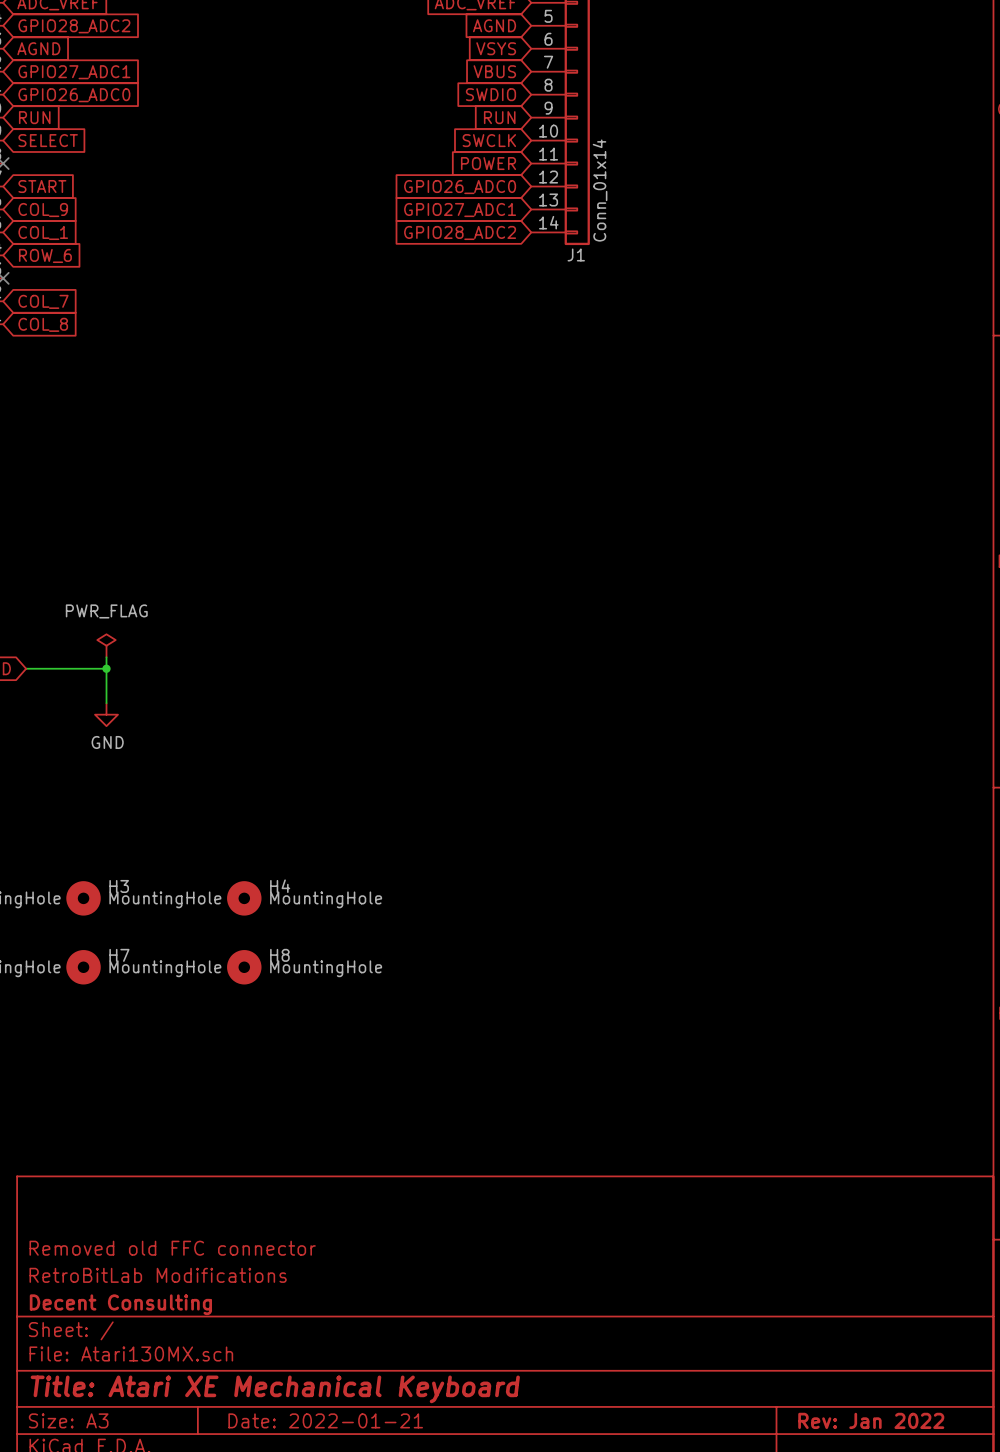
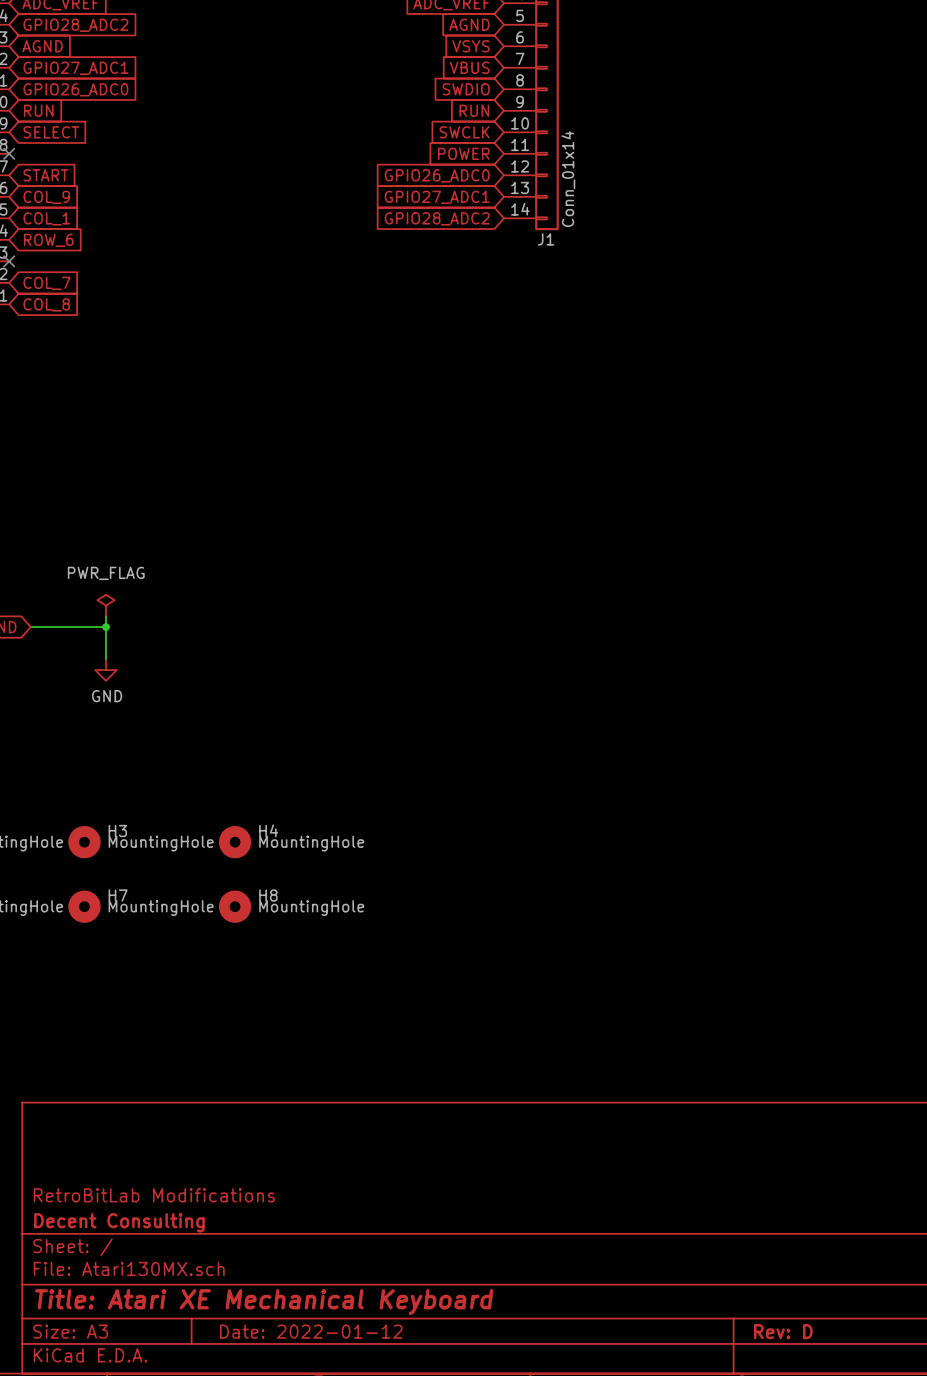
title block: Removed old FFC connector (172, 1248) -> none
title block: Date: 2022-01-21 (325, 1420) -> Date: 2022-01-12 (311, 1331)
title block: Rev: Jan 2022 (871, 1420) -> Rev: D (783, 1331)

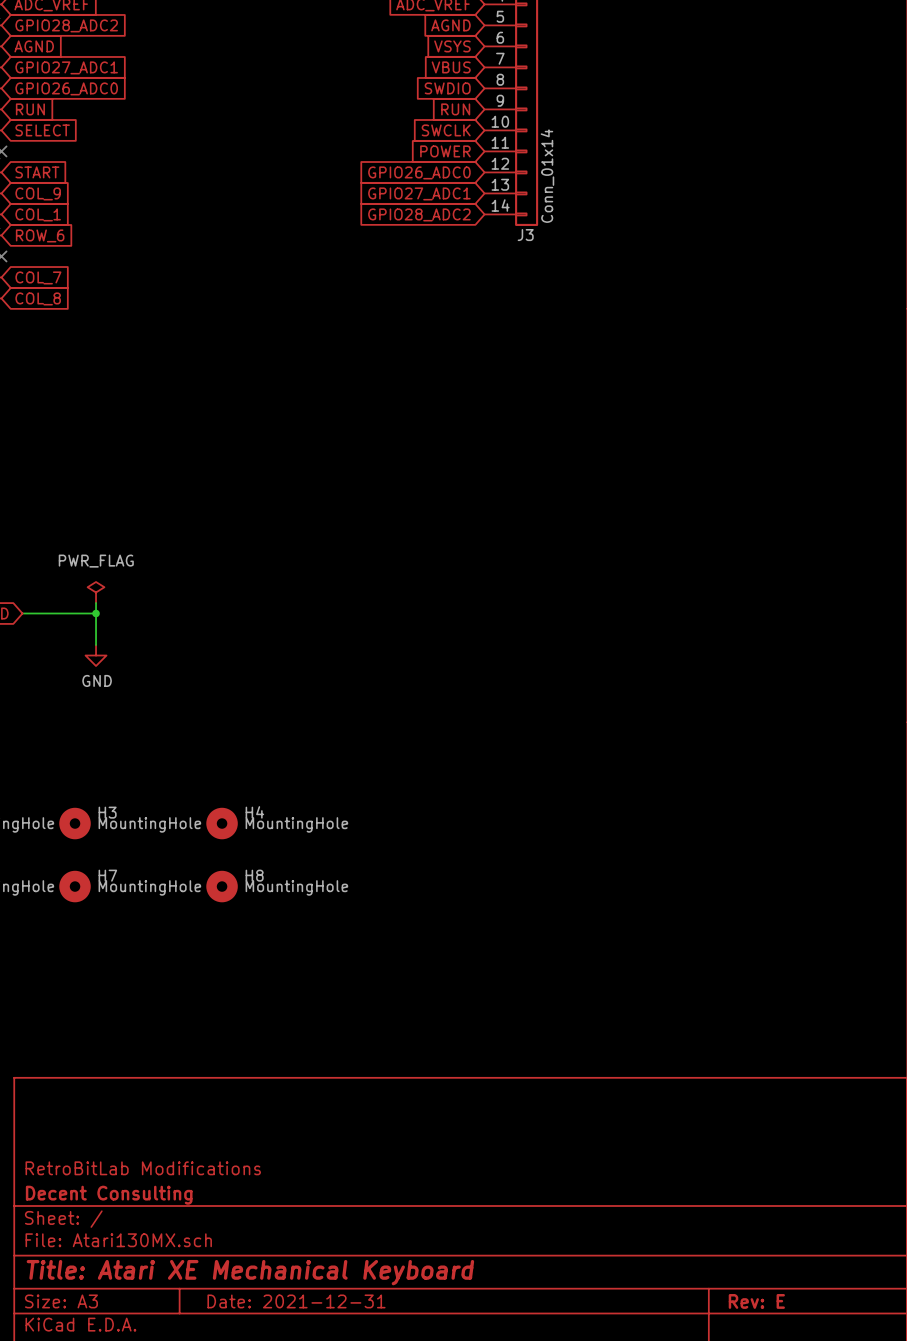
J1 name: J1 (546, 239) -> J3 (525, 235)
title block: Date: 2022-01-12 (311, 1331) -> Date: 2021-12-31 (296, 1301)
title block: Rev: D (783, 1331) -> Rev: E (756, 1301)

